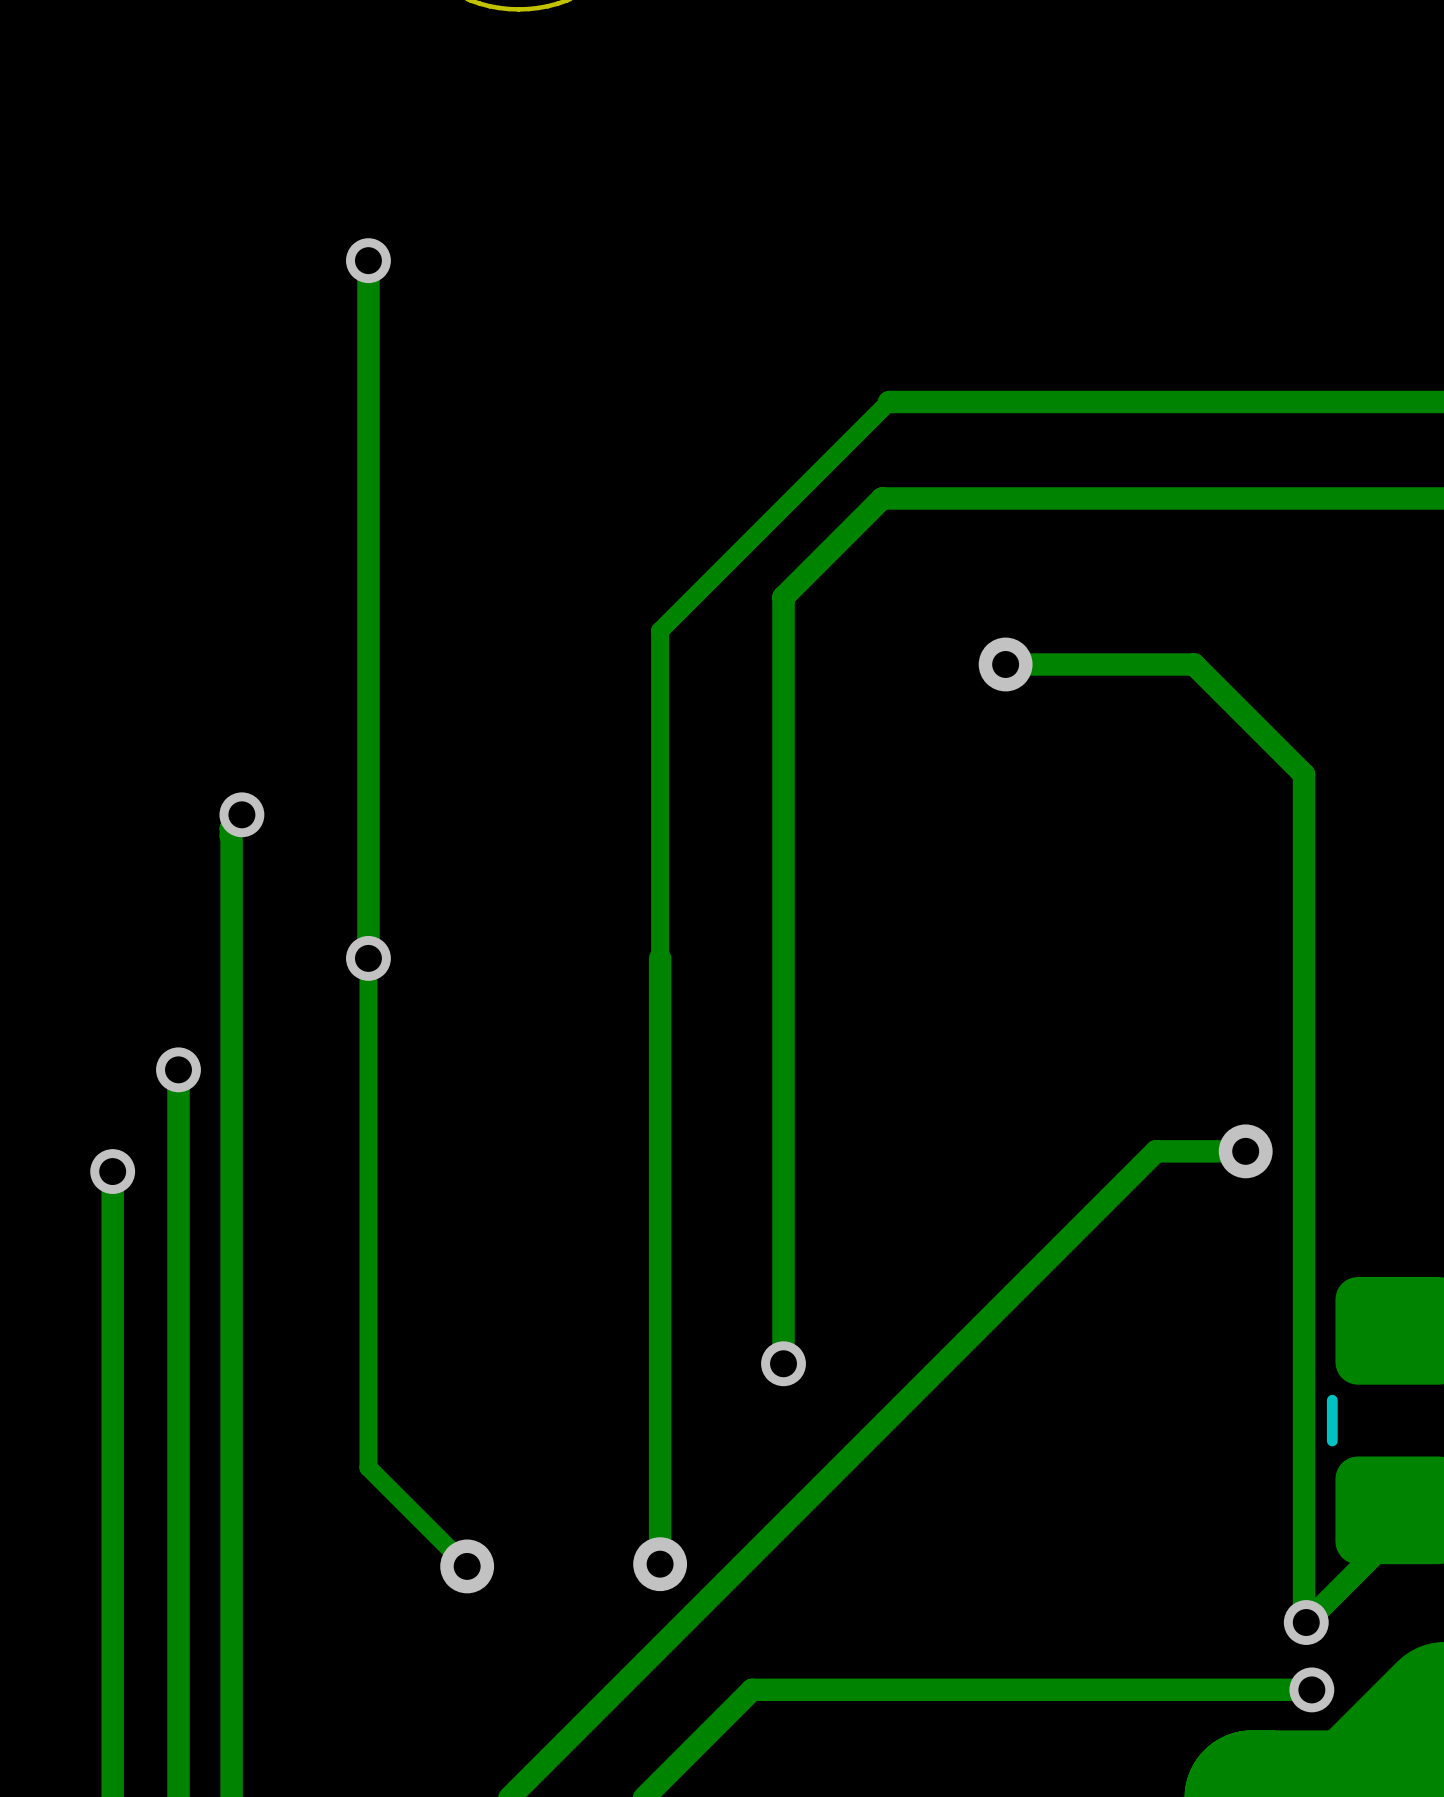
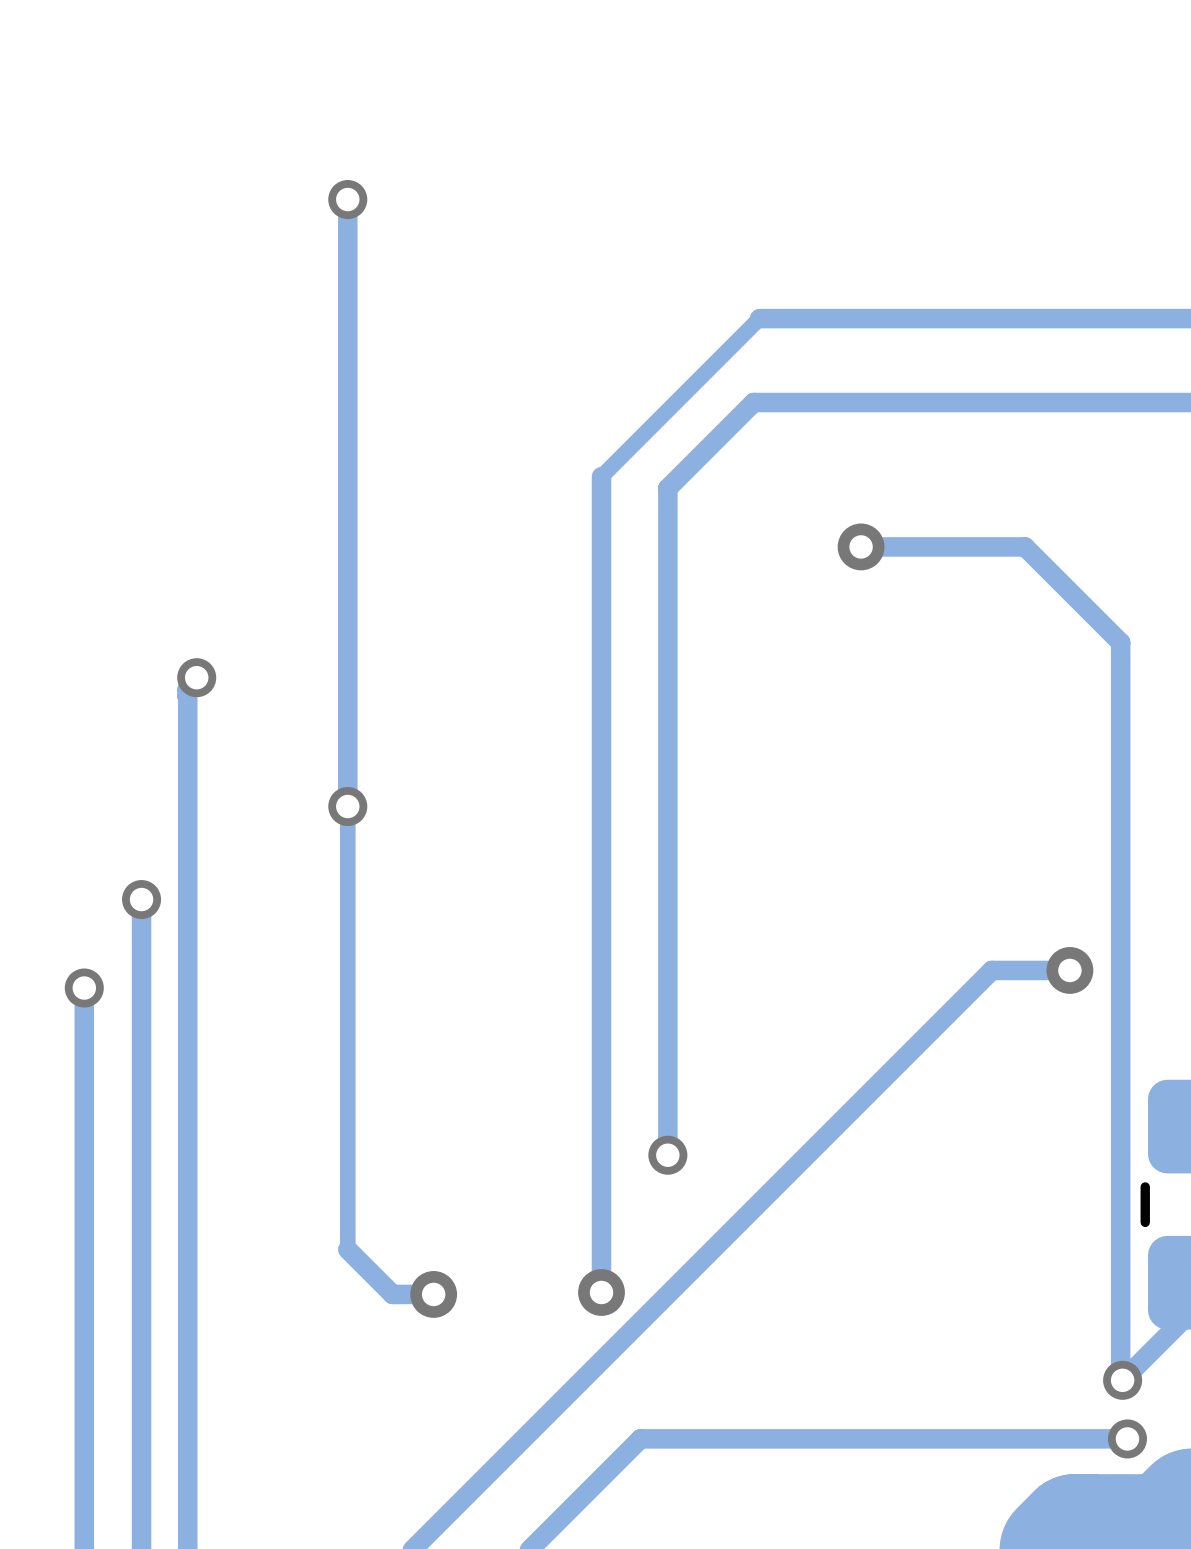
track: (368, 260) (368, 1467) (467, 1566) -> none
via position: (368, 260) -> (347, 199)
track: none -> (347, 199) (347, 1249) (392, 1294) (433, 1294)
track: (707, 583) (660, 630) (660, 1564) -> (601, 476) (601, 1292)
via position: (368, 958) -> (347, 806)
via position: (660, 1564) -> (601, 1292)
via position: (467, 1566) -> (433, 1294)

